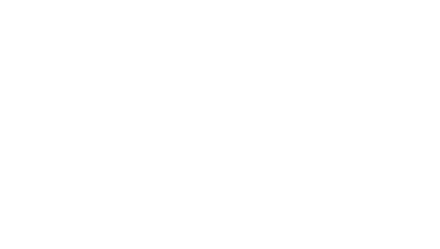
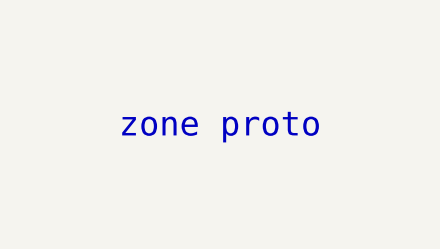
text: none -> zone proto (220, 127)

